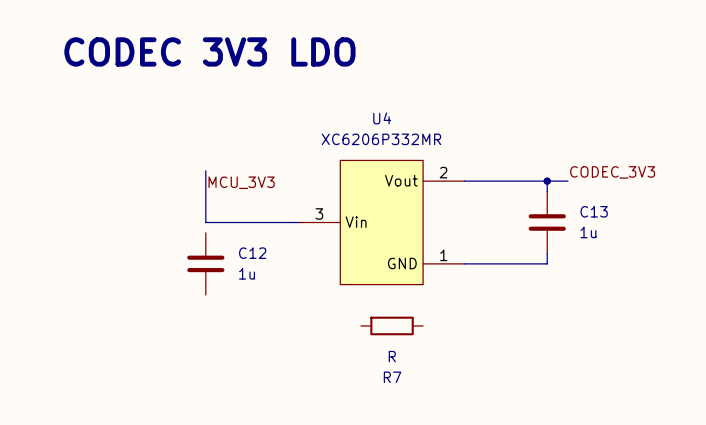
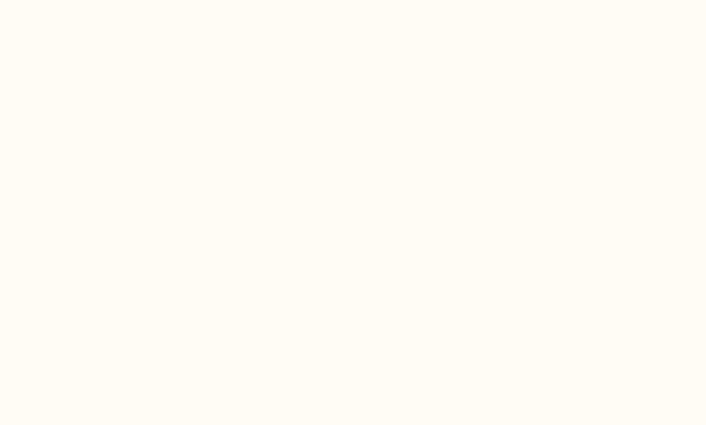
text: CODEC 3V3 LDO (209, 51) -> none
wire: (205, 170) (205, 222) (298, 222) -> none
label: CODEC_3V3 (612, 172) -> none
wire: (464, 181) (567, 181) -> none
wire: (547, 181) (547, 191) -> none
junction: (547, 181) -> none
label: MCU_3V3 (241, 182) -> none
U4: XC6206P332MR (381, 222) -> none
C13: 1u (547, 222) -> none
wire: (547, 253) (547, 263) (464, 263) -> none
C12: 1u (205, 263) -> none
R7: R (392, 325) -> none

